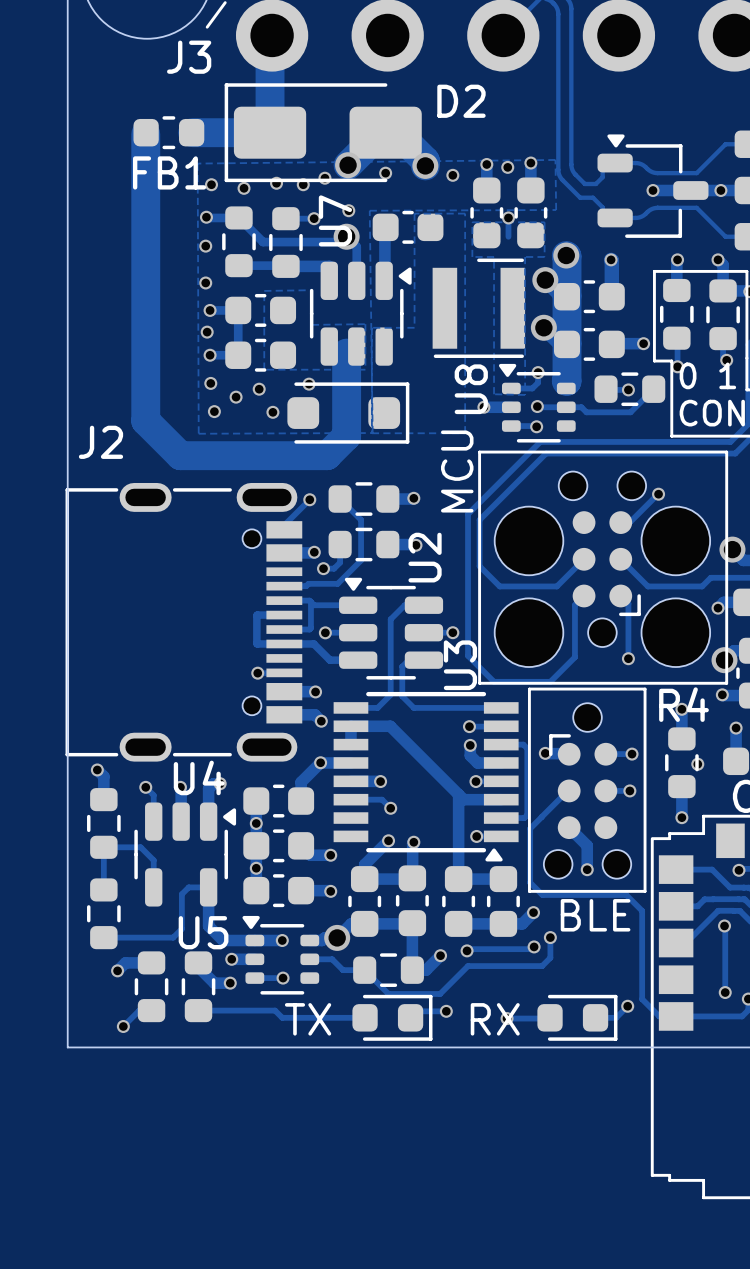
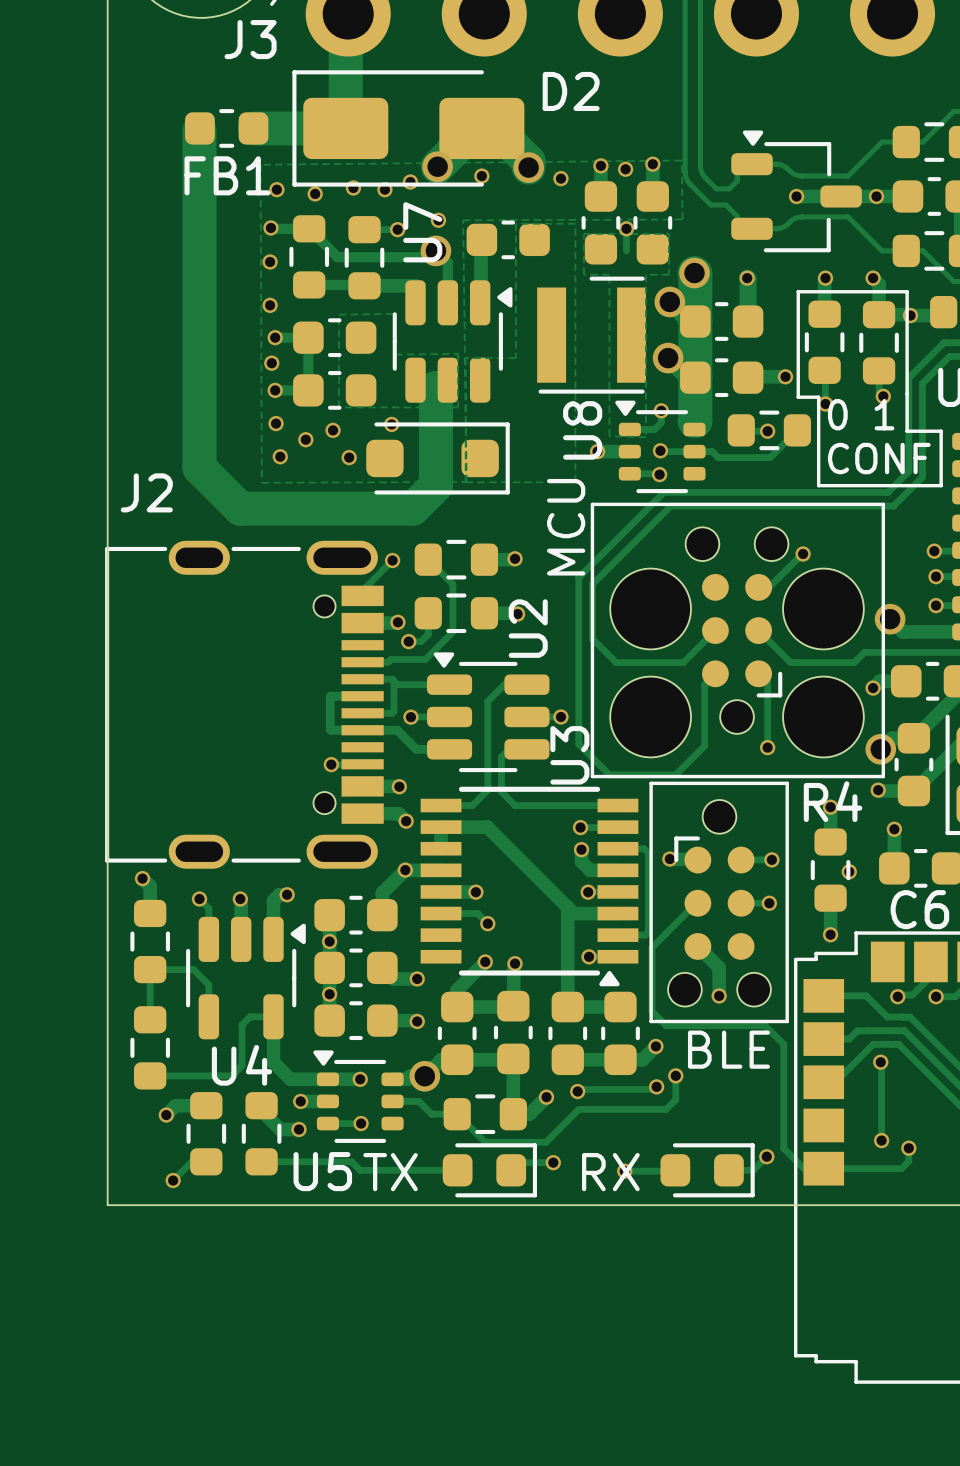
U4 name position: U4 (199, 777) -> U4 (241, 1065)
U5 name position: U5 (203, 932) -> U5 (322, 1171)

